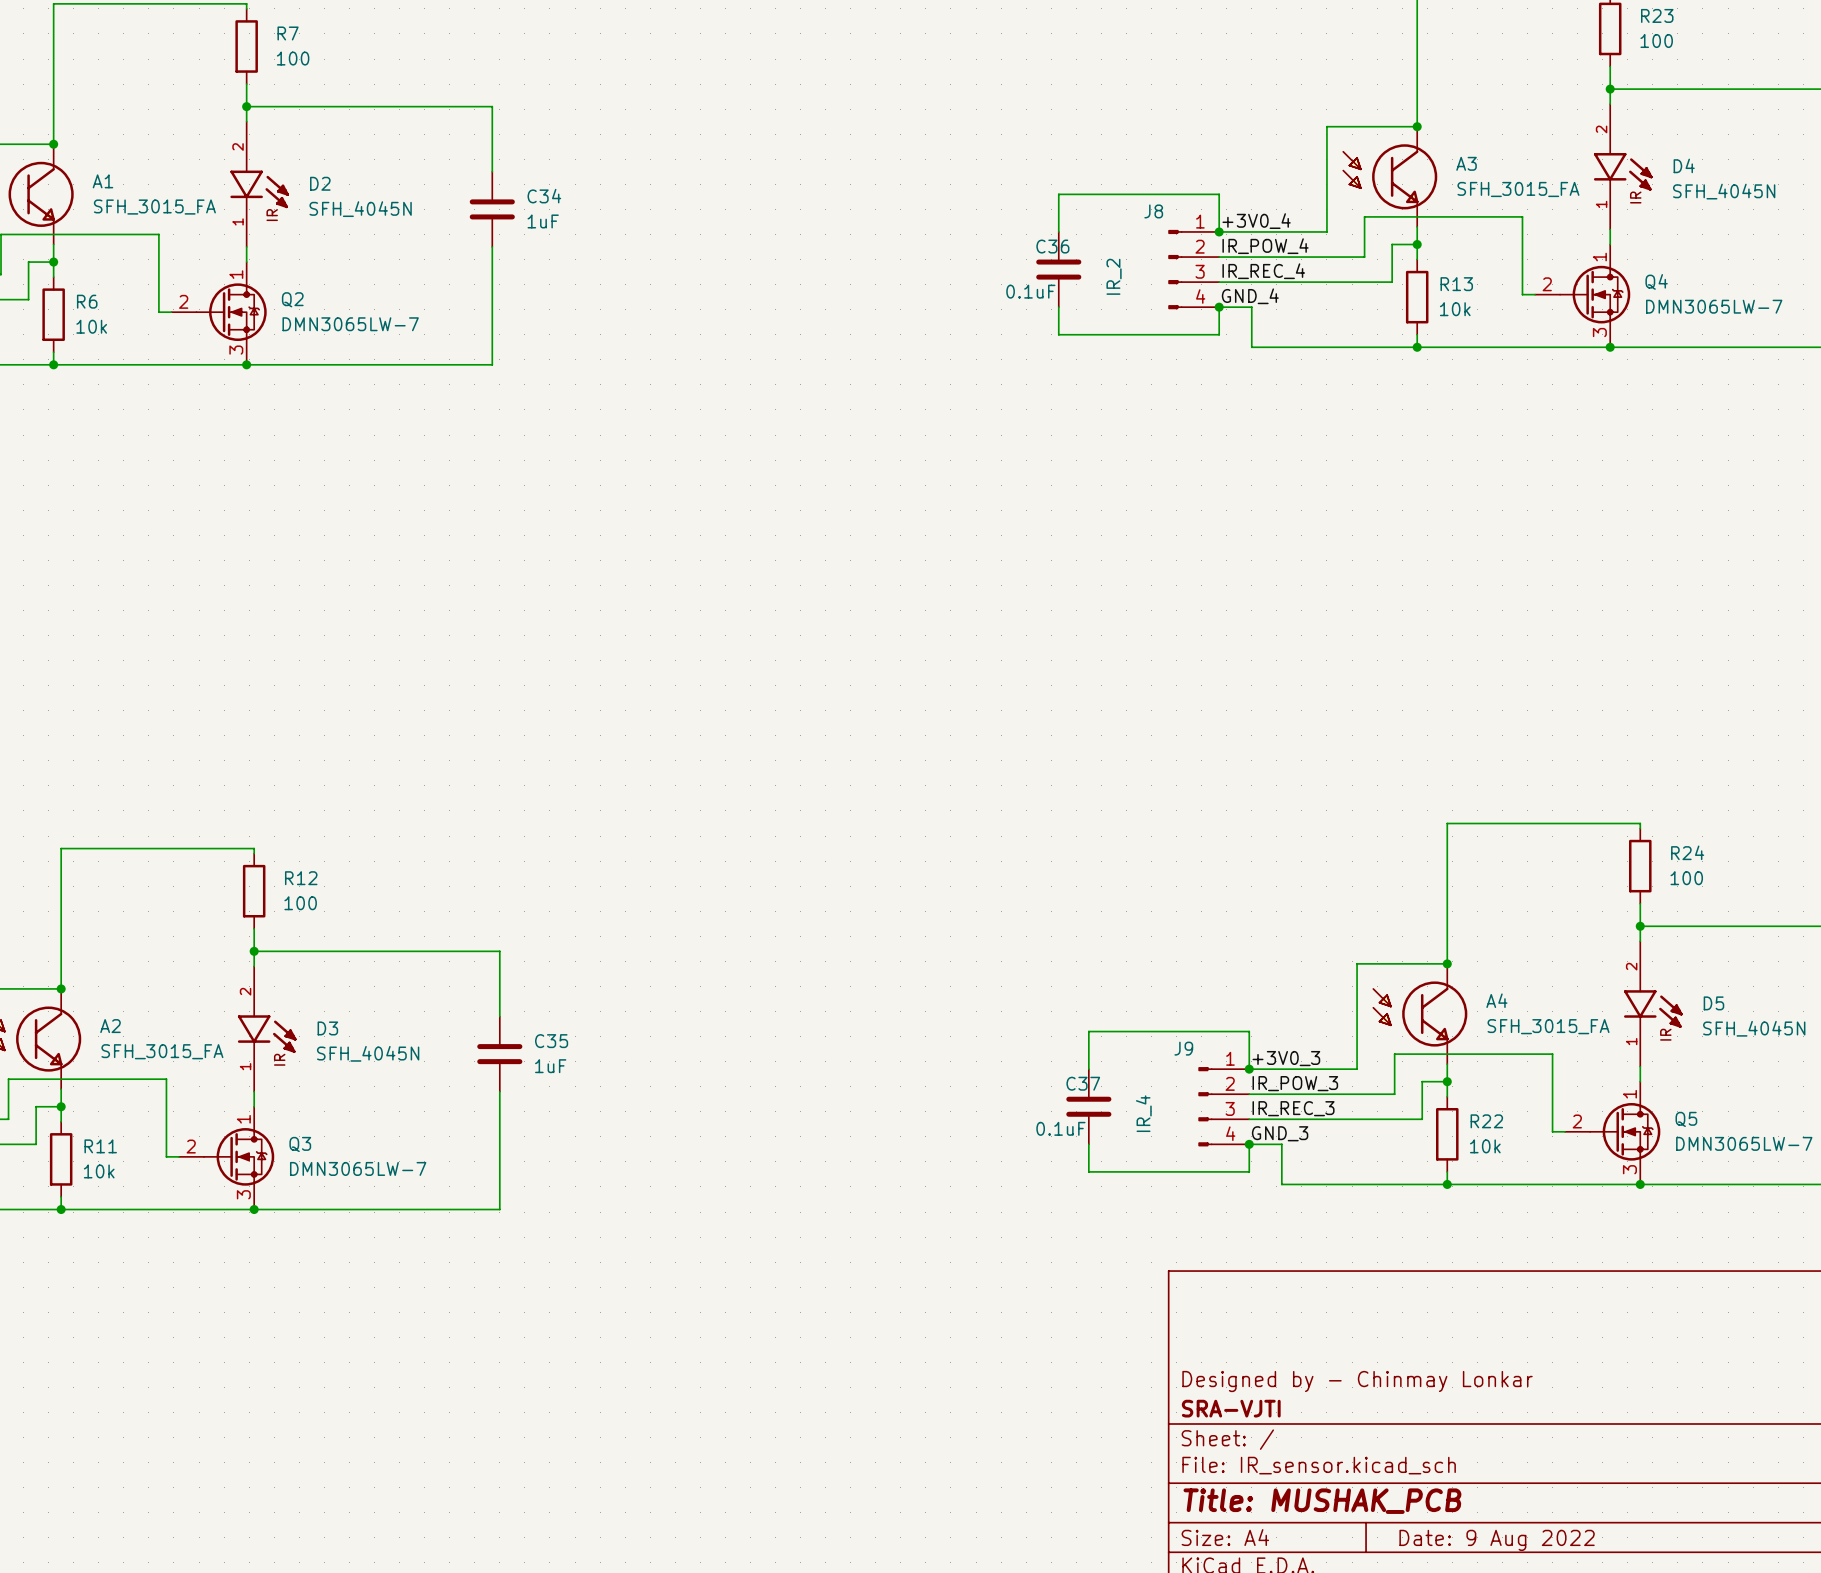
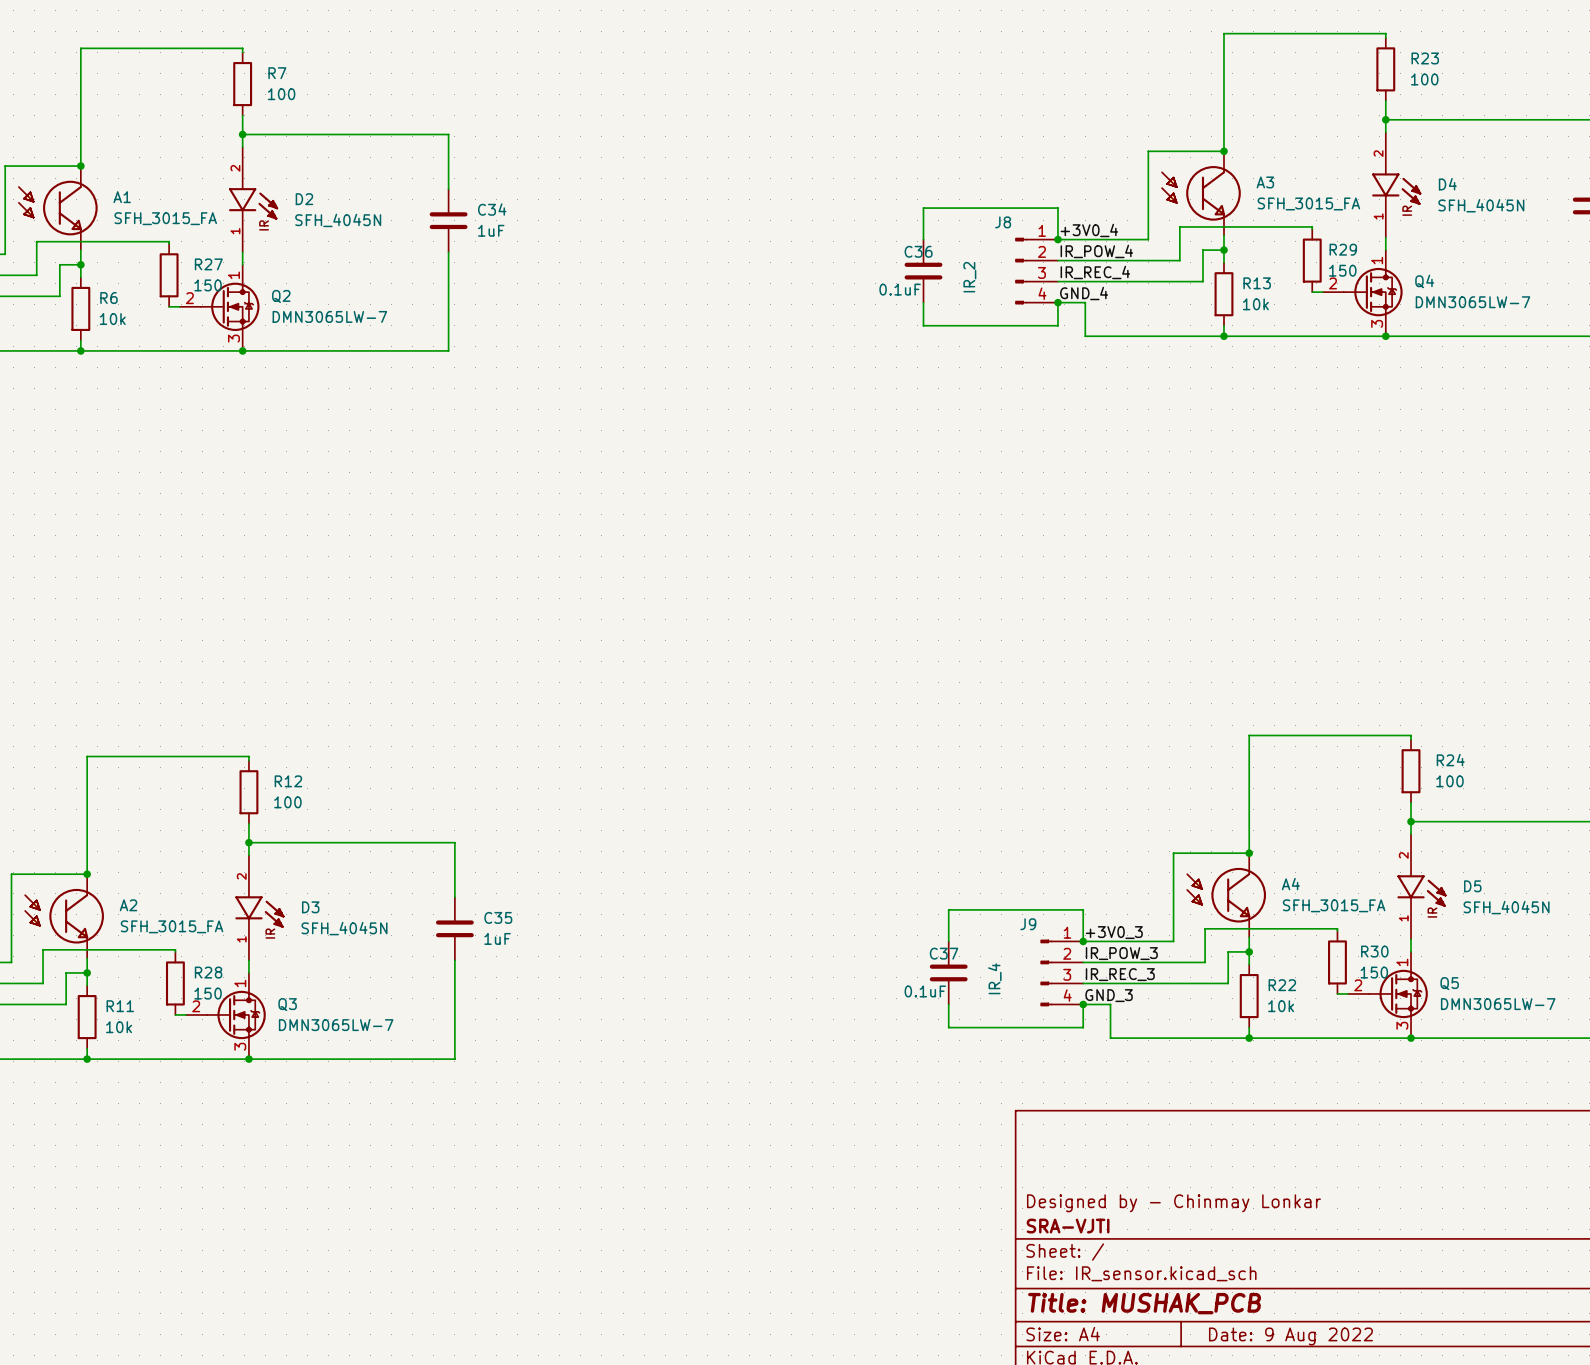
wire: (1522, 219) (1522, 294) -> none
wire: (158, 236) (158, 312) -> none
R29: none -> 150 (1312, 260)
R27: none -> 150 (169, 275)
wire: (1552, 1056) (1552, 1131) -> none
wire: (166, 1081) (166, 1156) -> none
R30: none -> 150 (1337, 962)
R28: none -> 150 (175, 983)

